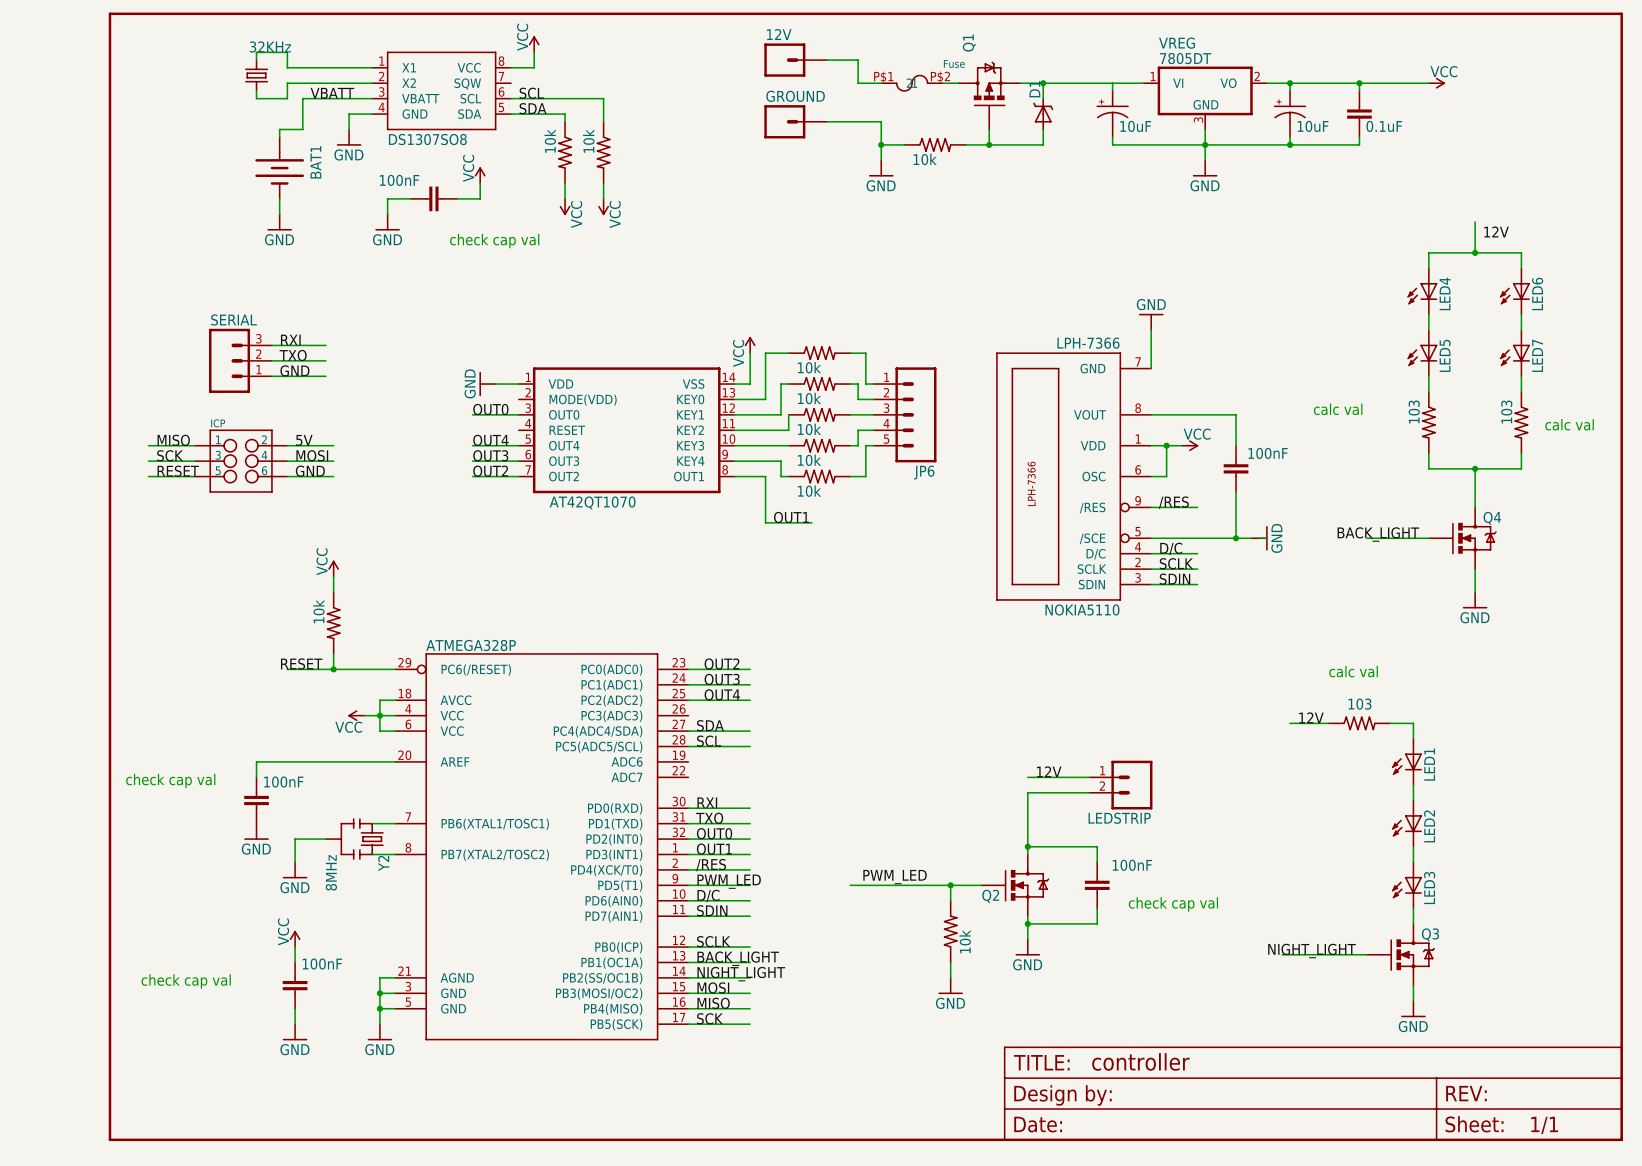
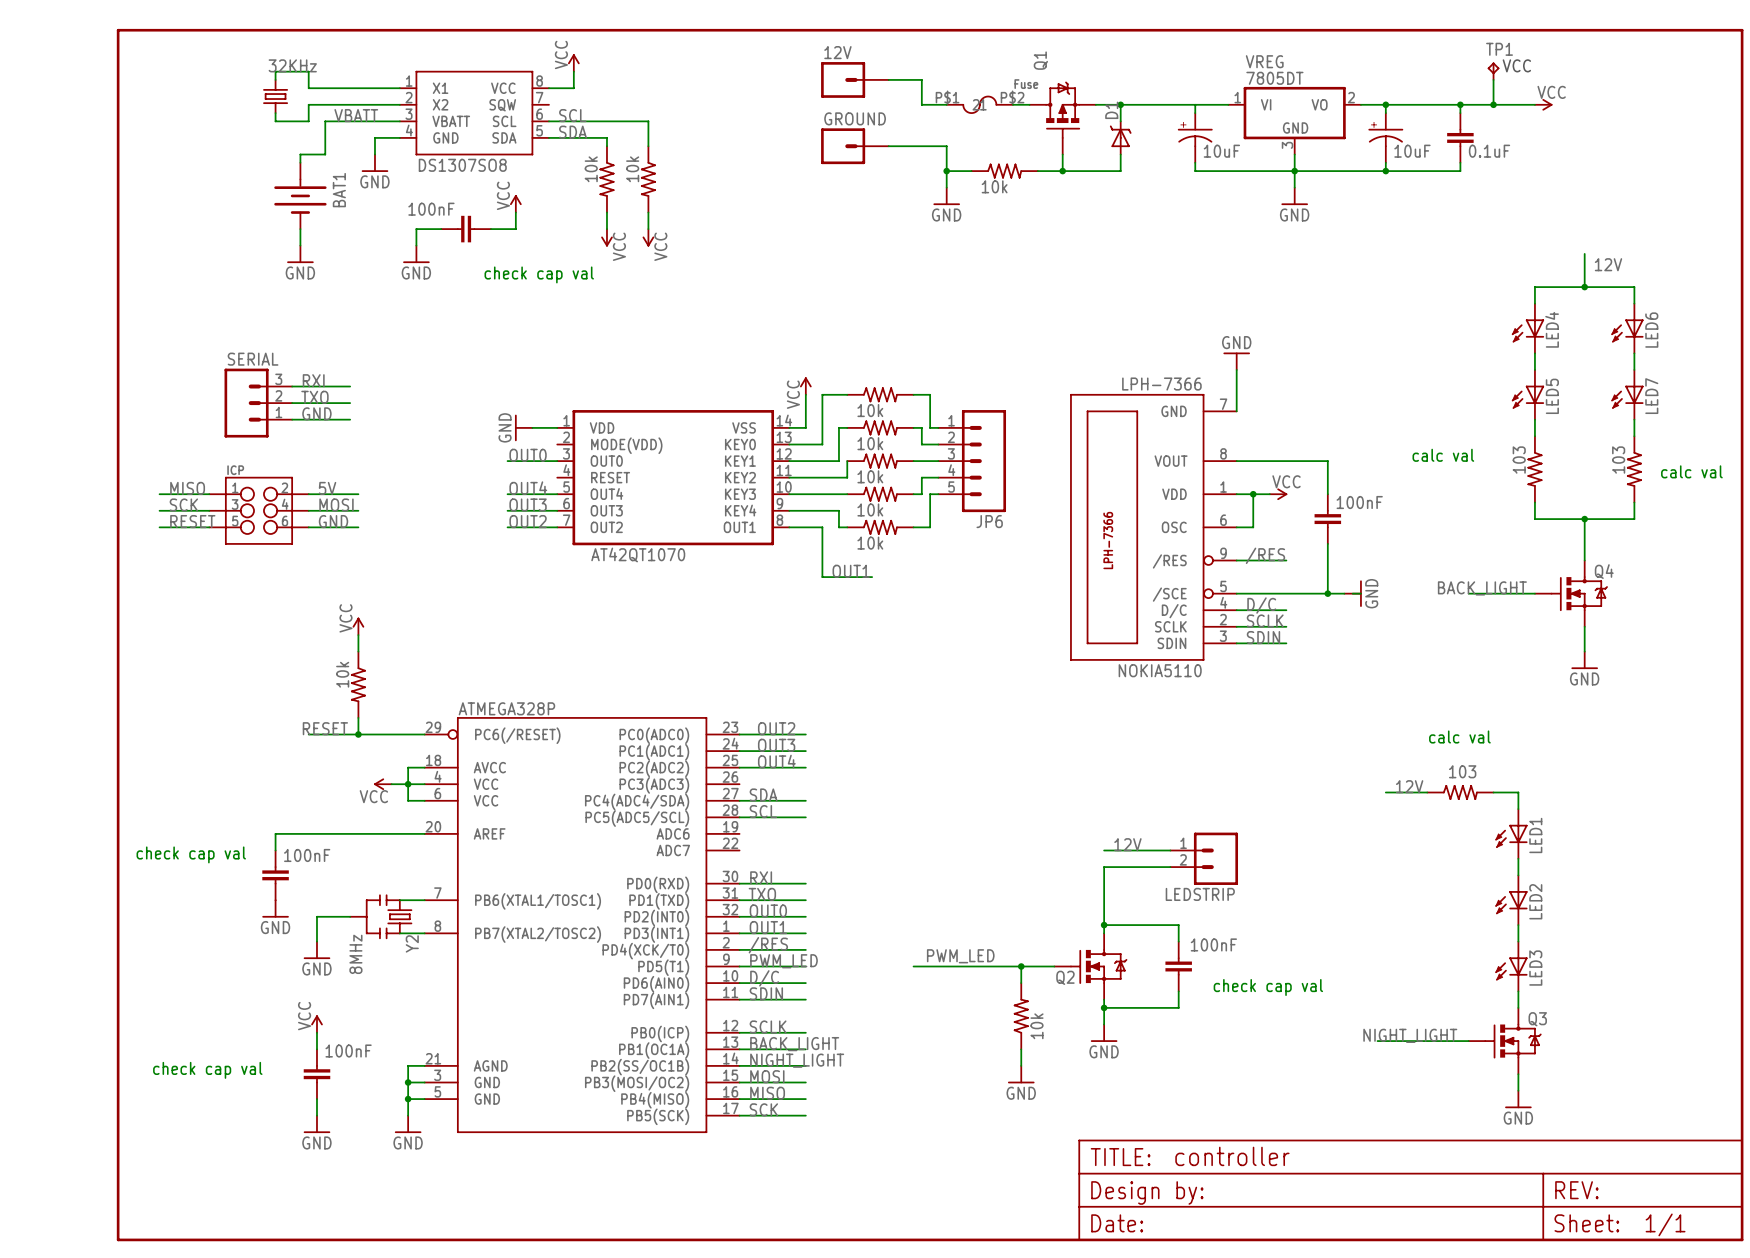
TP1: none -> (1493, 71)
wire: none -> (1493, 79) (1493, 104)
junction: none -> (1493, 104)

